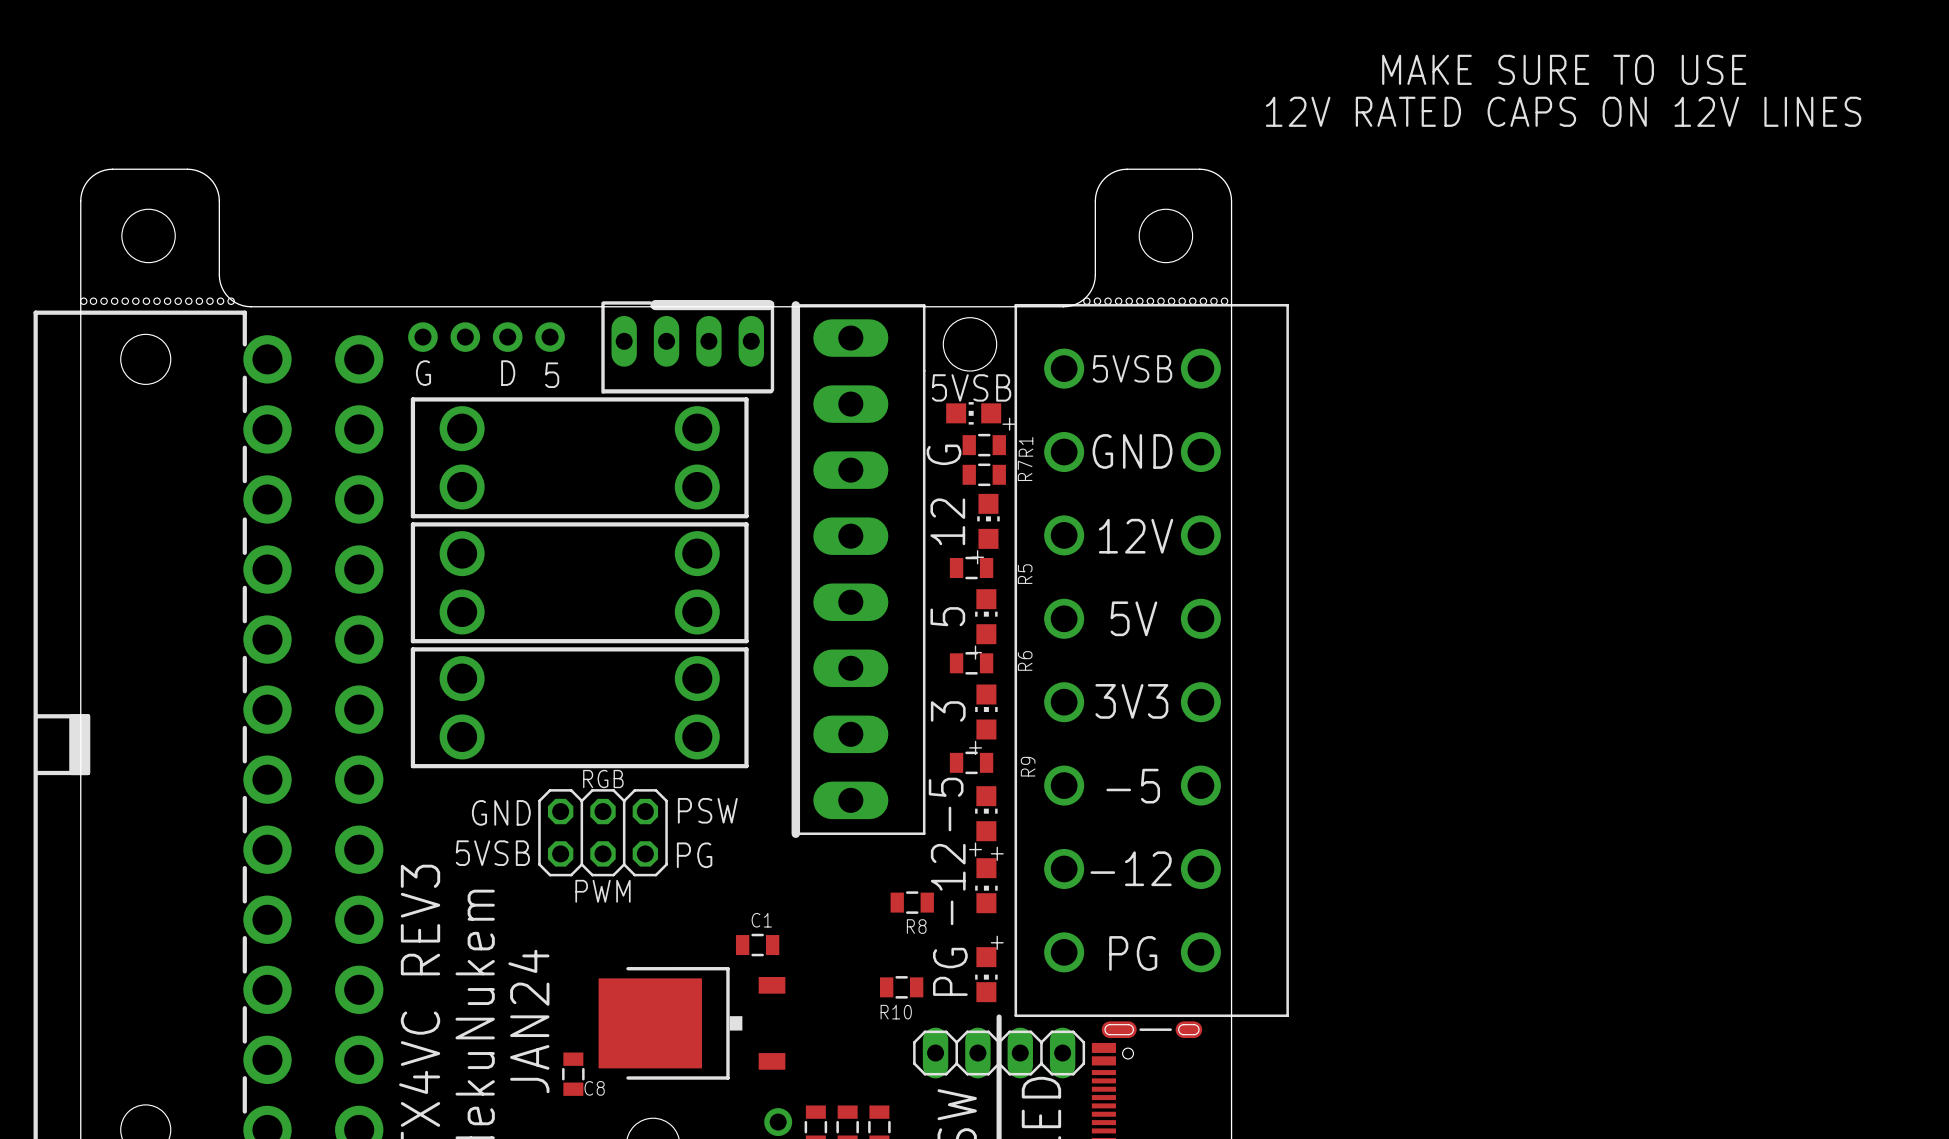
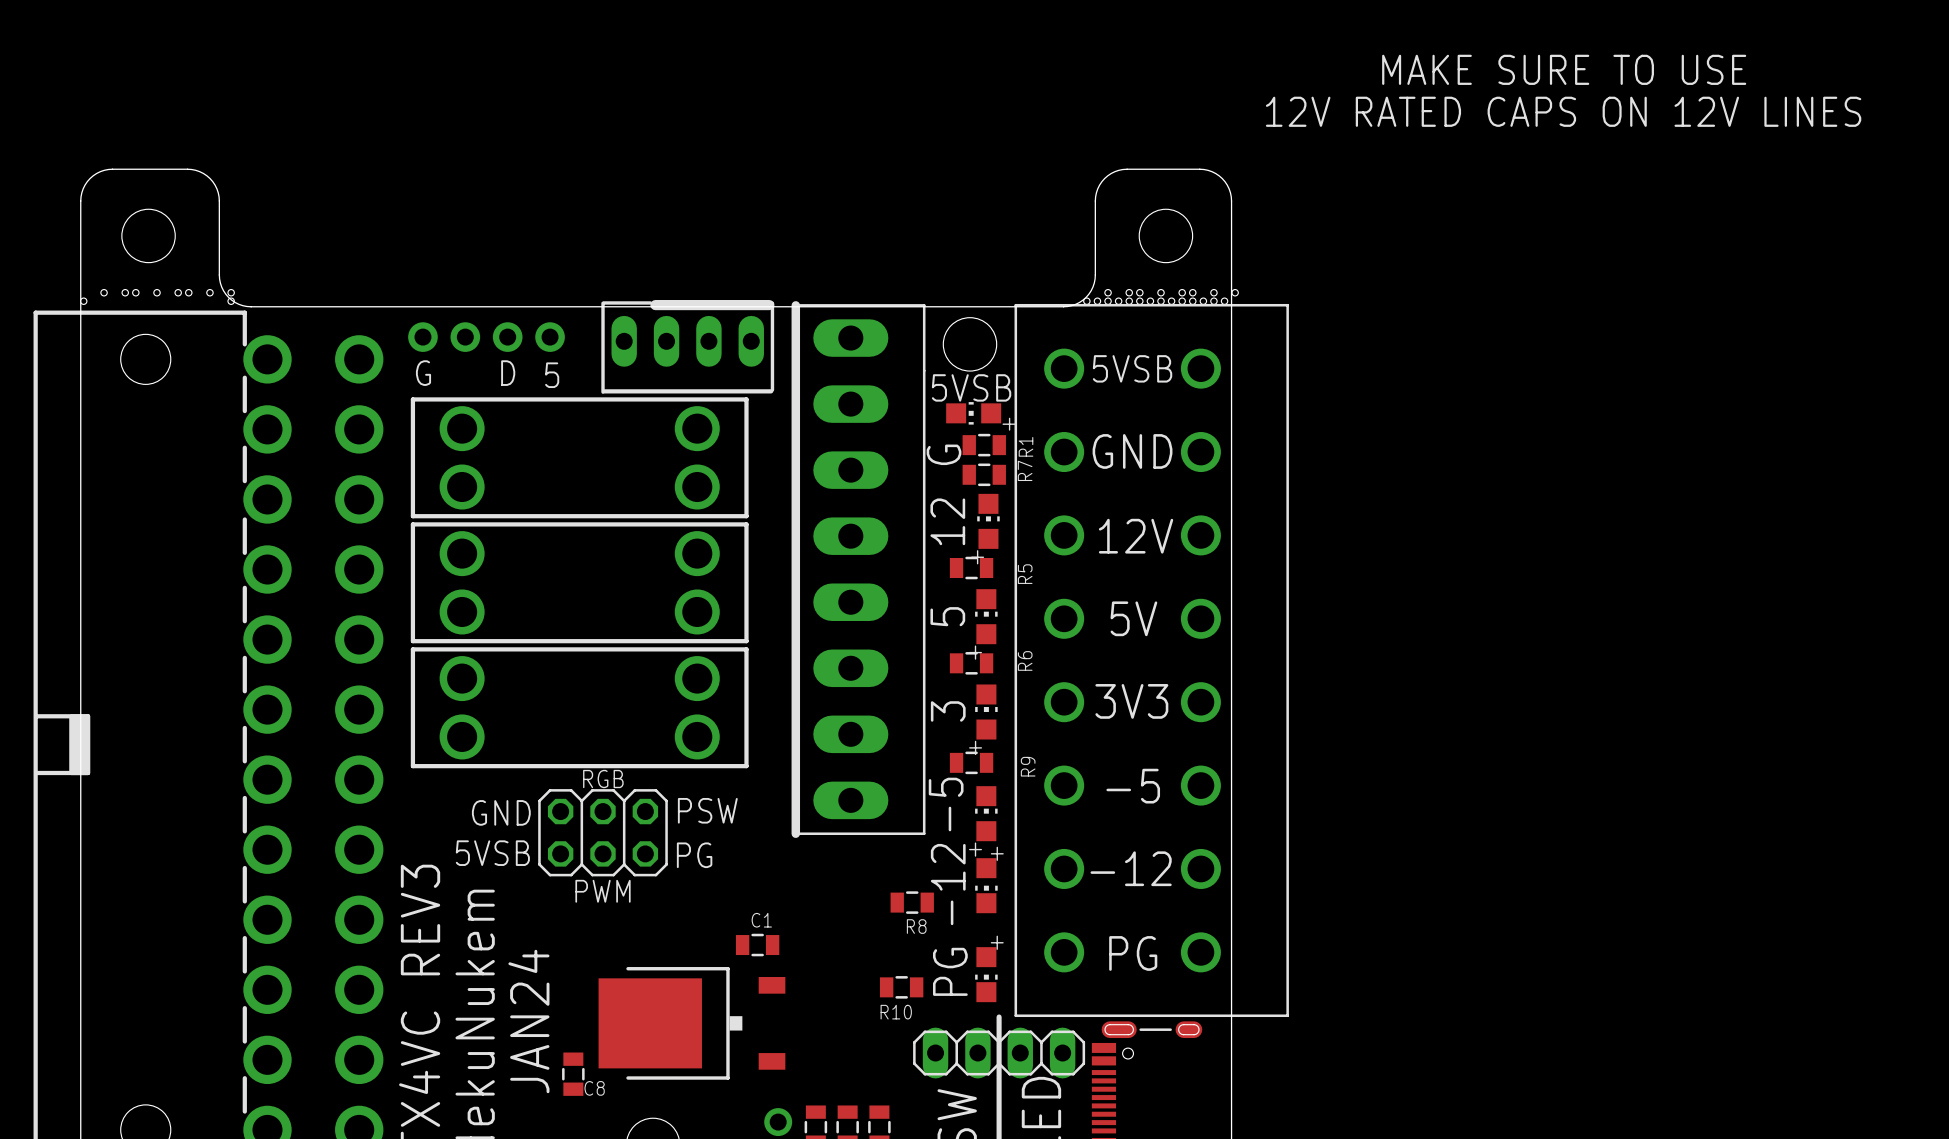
hole: none -> (104, 292)
hole: none -> (125, 292)
hole: none -> (135, 292)
hole: none -> (157, 292)
hole: none -> (178, 292)
hole: none -> (188, 292)
hole: none -> (209, 292)
hole: none -> (231, 292)
hole: none -> (1108, 292)
hole: none -> (1129, 292)
hole: none -> (1139, 292)
hole: none -> (1161, 292)
hole: none -> (1182, 292)
hole: none -> (1192, 292)
hole: none -> (1213, 292)
hole: none -> (1235, 292)
hole: (93, 301) -> none
hole: (104, 301) -> none
hole: (114, 301) -> none
hole: (125, 301) -> none
hole: (135, 301) -> none
hole: (146, 301) -> none
hole: (157, 301) -> none
hole: (167, 301) -> none
hole: (178, 301) -> none
hole: (188, 301) -> none
hole: (199, 301) -> none
hole: (209, 301) -> none
hole: (220, 301) -> none

